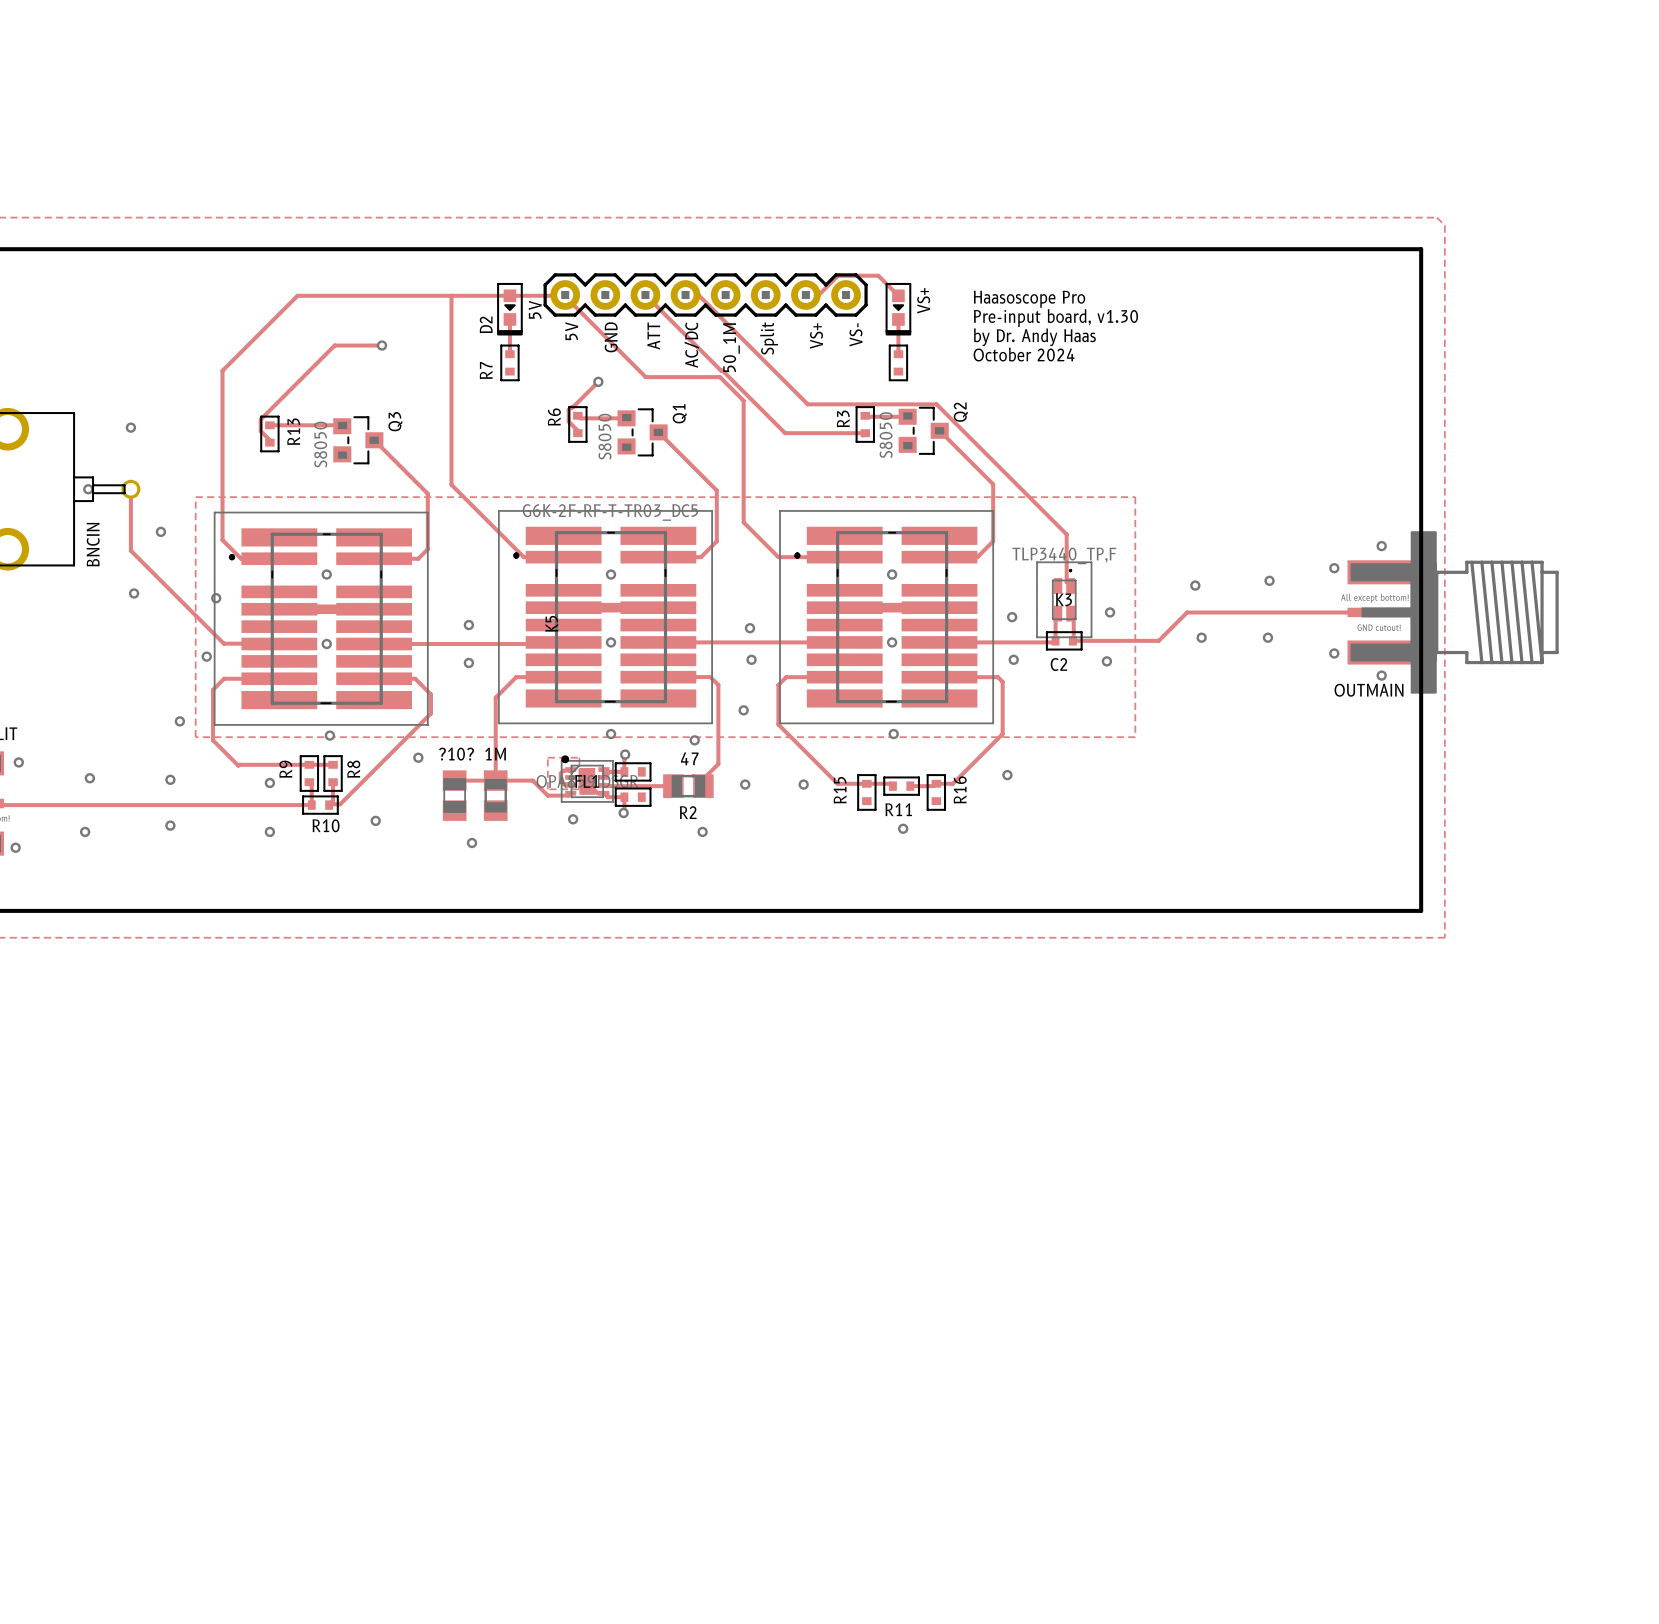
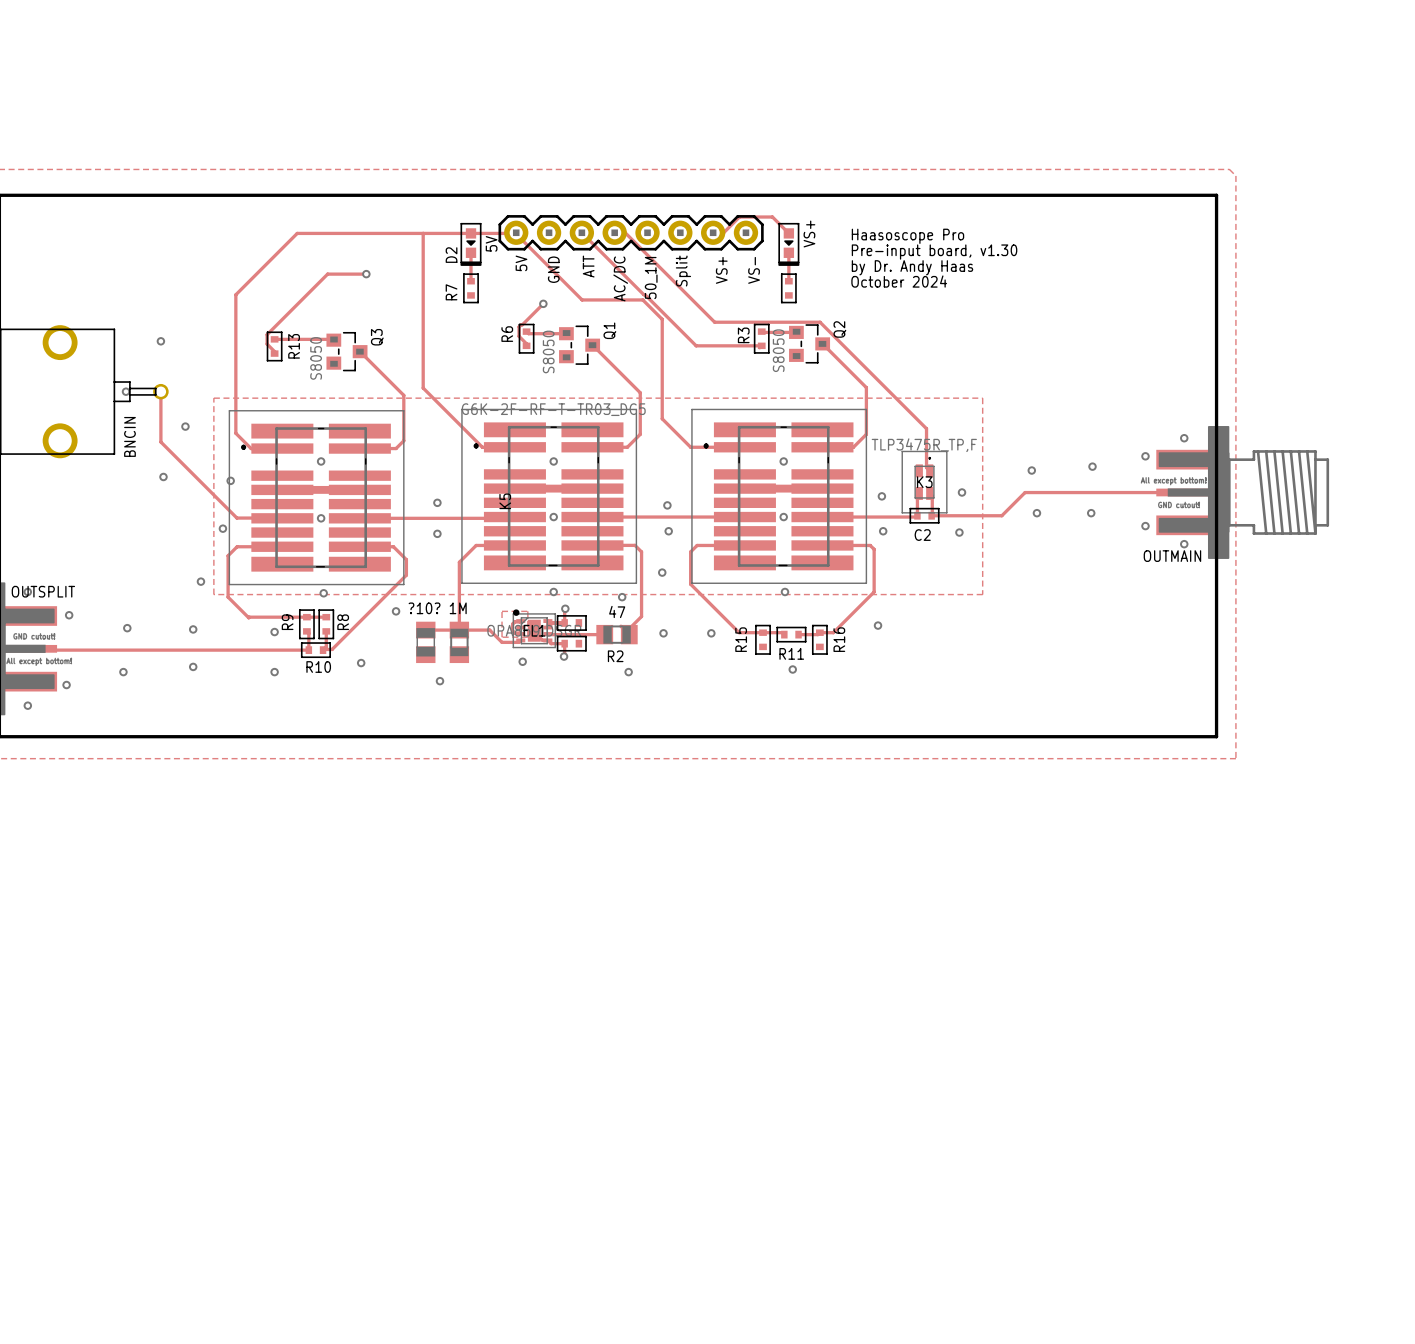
K3 value: TLP3440_TP,F (1064, 555) -> TLP3475R_TP,F (924, 445)

